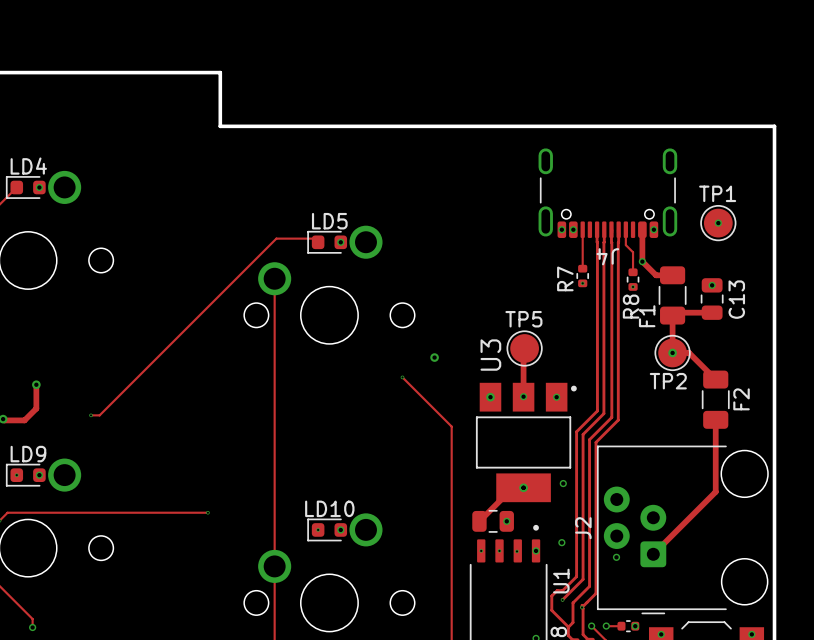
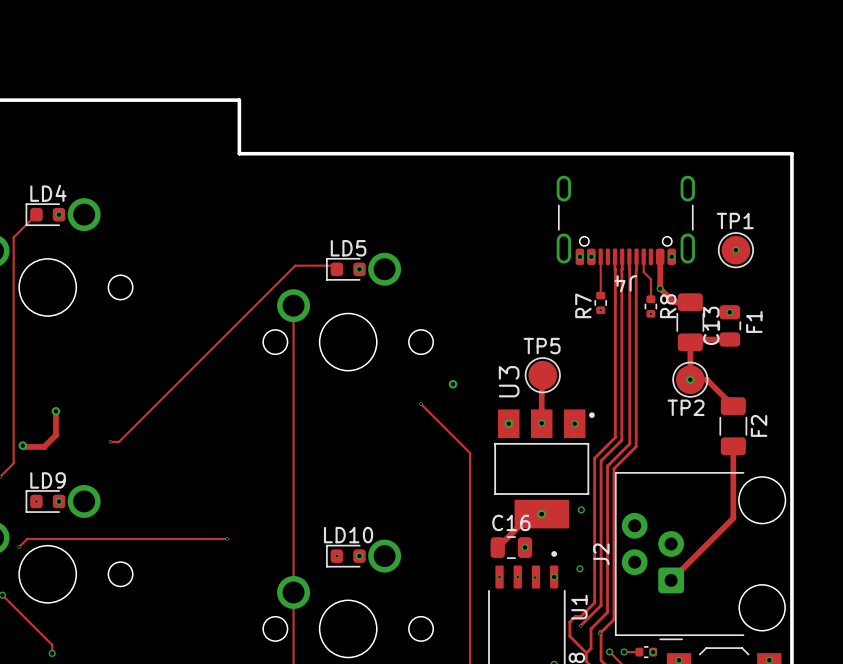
C13 name position: C13 (736, 299) -> C13 (711, 325)
R8 name position: R8 (631, 306) -> R8 (668, 306)
F1 name position: F1 (647, 316) -> F1 (754, 321)
C16 name: none -> C16 (511, 522)
via: (616, 557) -> none

